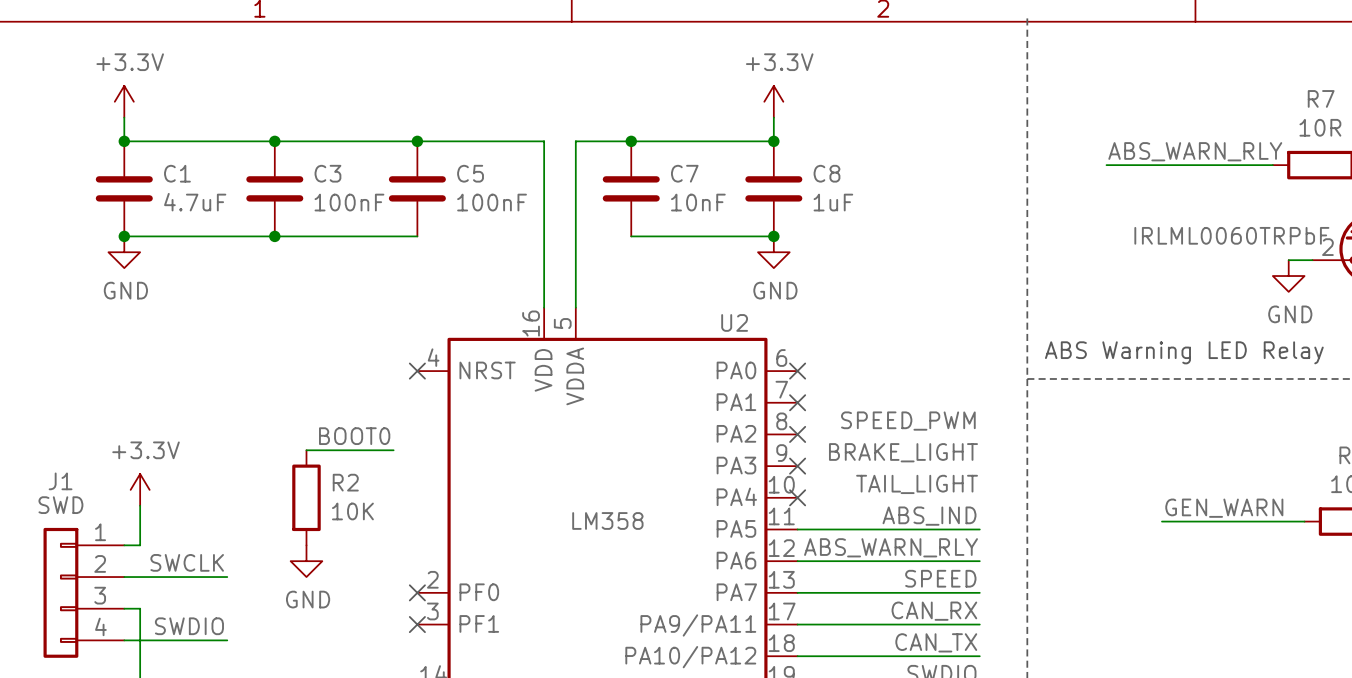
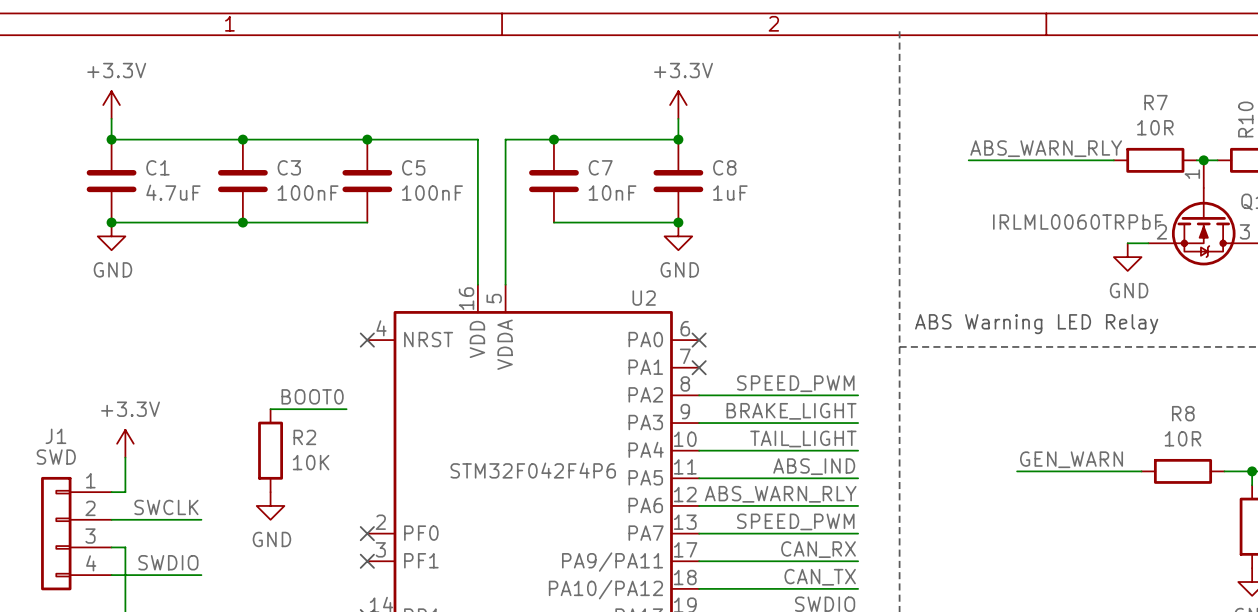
wire: none -> (699, 395) (858, 395)
no-connect mark: (797, 434) -> none
wire: none -> (699, 423) (858, 423)
no-connect mark: (797, 466) -> none
wire: none -> (699, 450) (858, 450)
no-connect mark: (797, 497) -> none
U2 value: LM358 (607, 520) -> STM32F042F4P6 (533, 470)
label: SPEED (940, 578) -> SPEED_PWM (795, 521)

